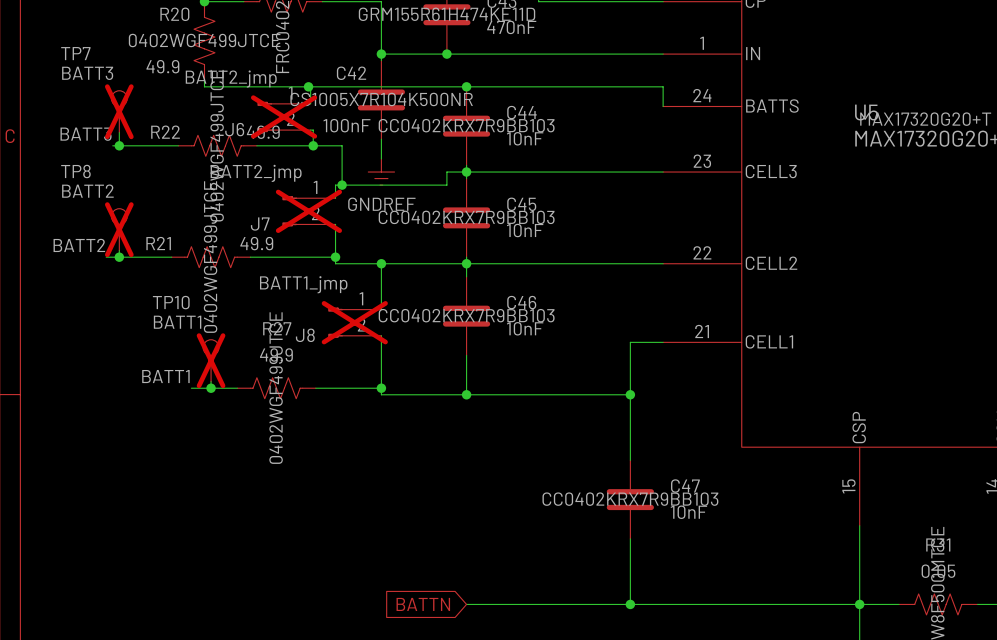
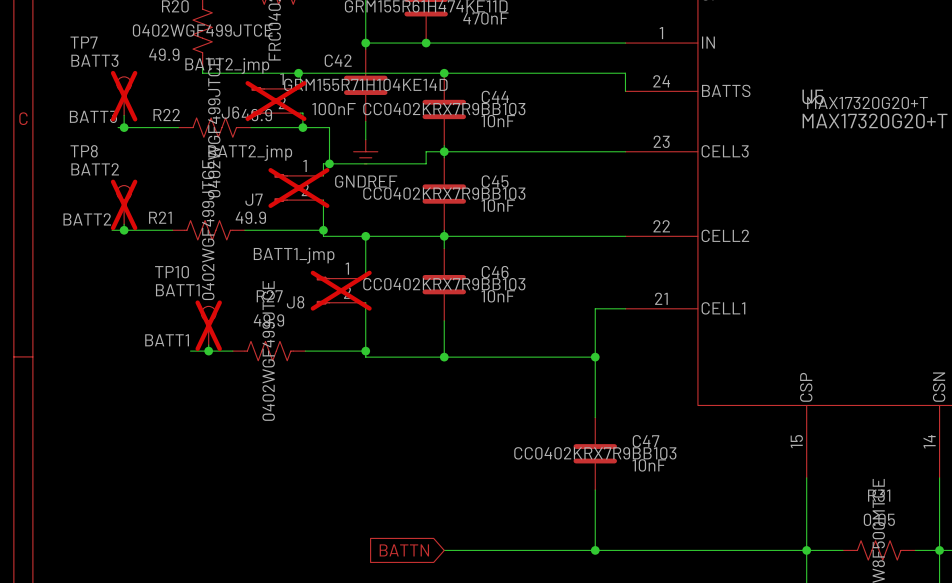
C42 text: CS1005X7R104K500NR (381, 99) -> GRM155R71H104KE14D (365, 84)

